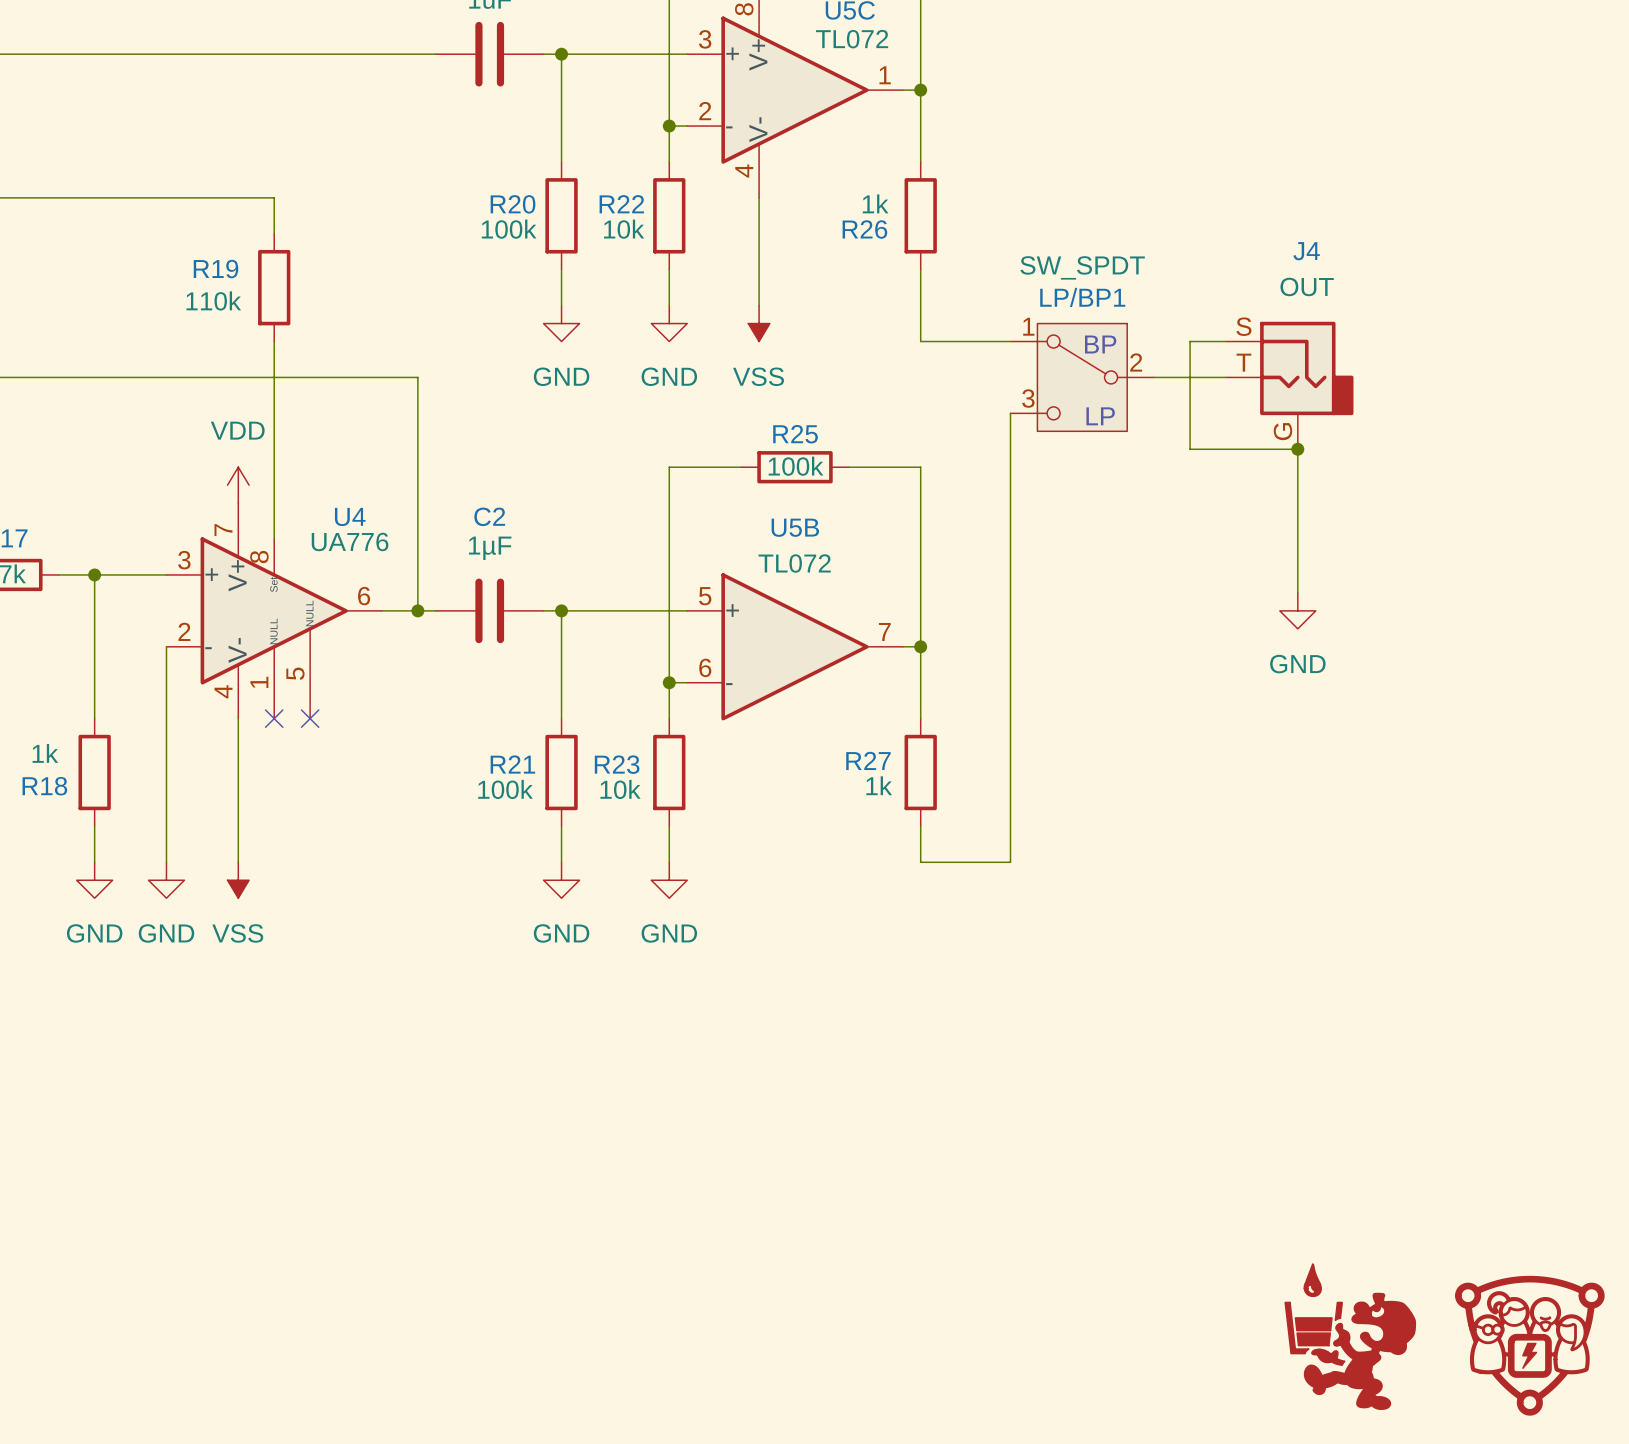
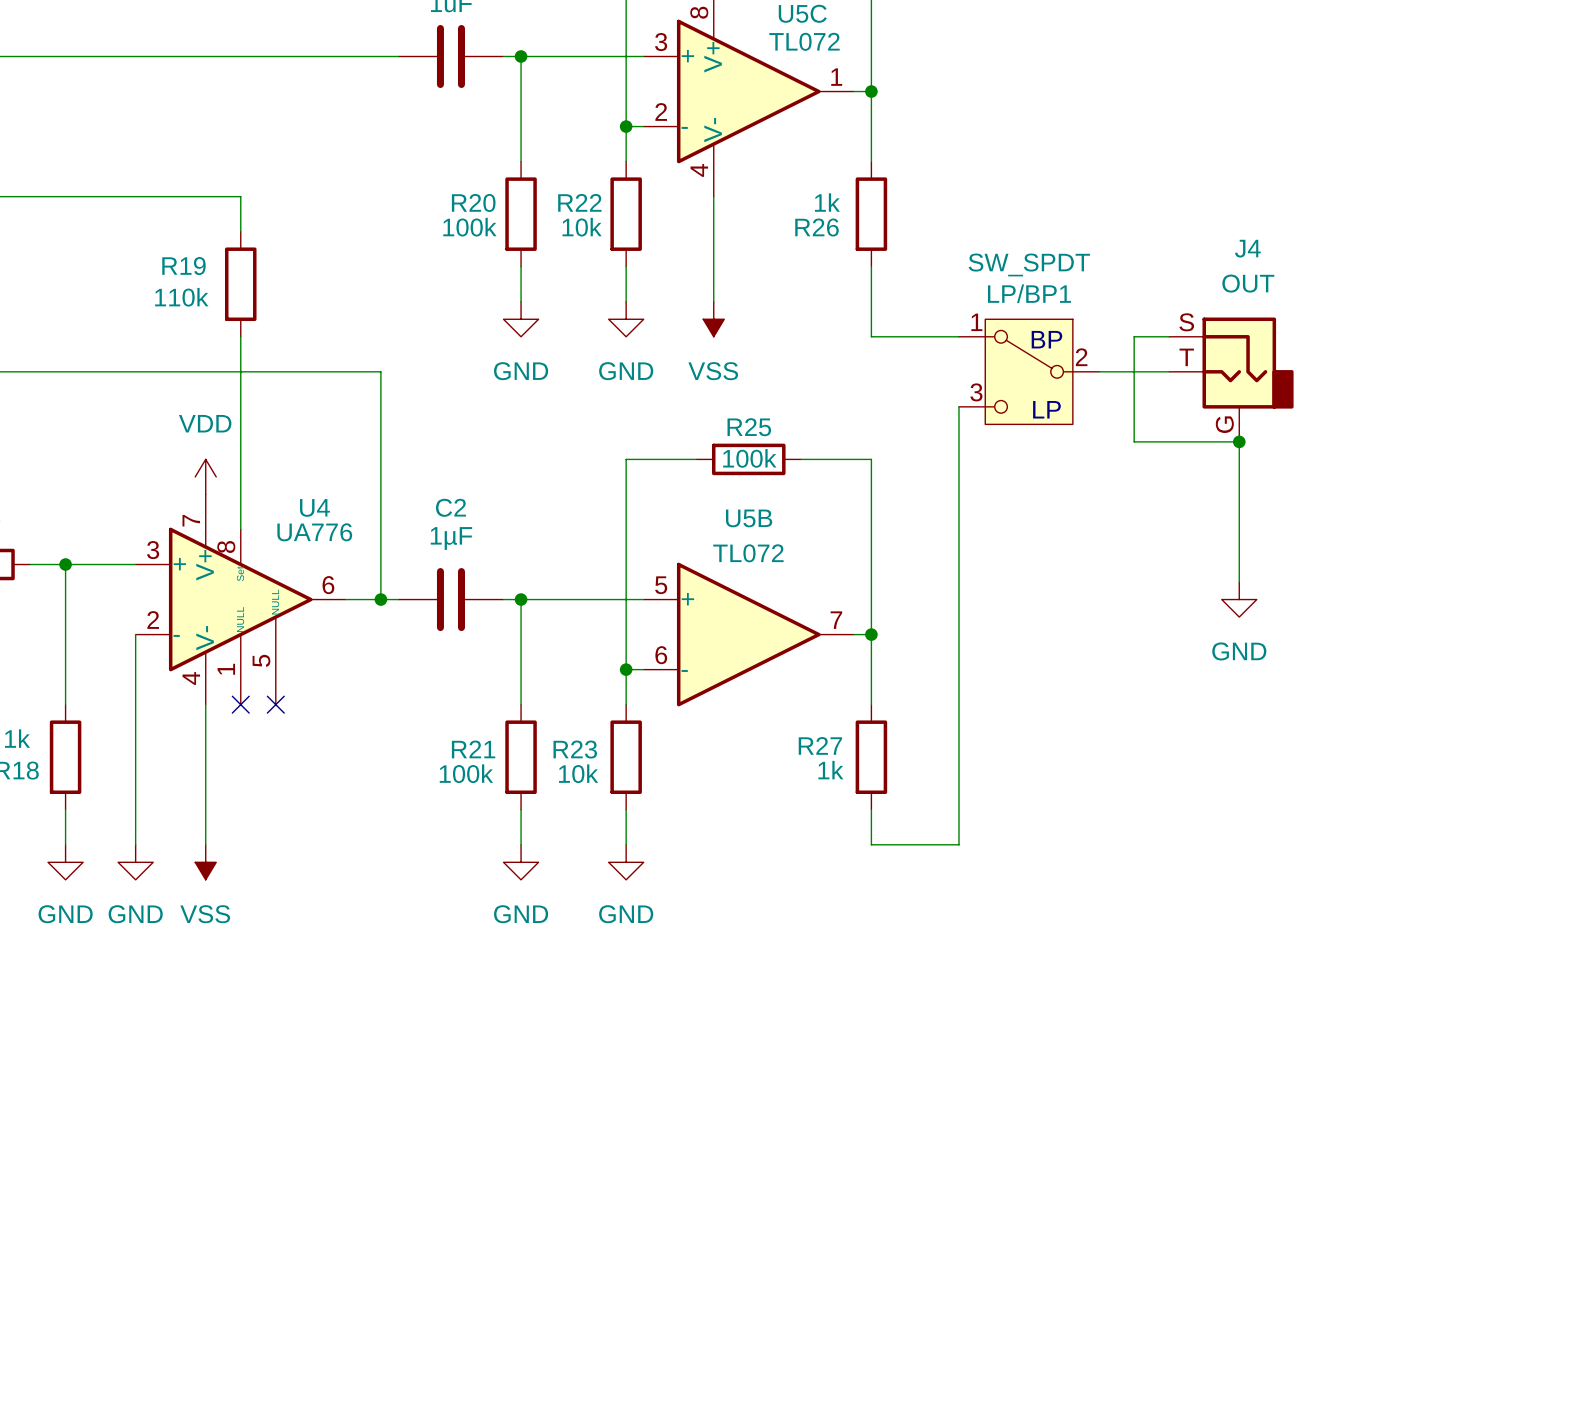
part: (1350, 1336) -> none
part: (1529, 1345) -> none

